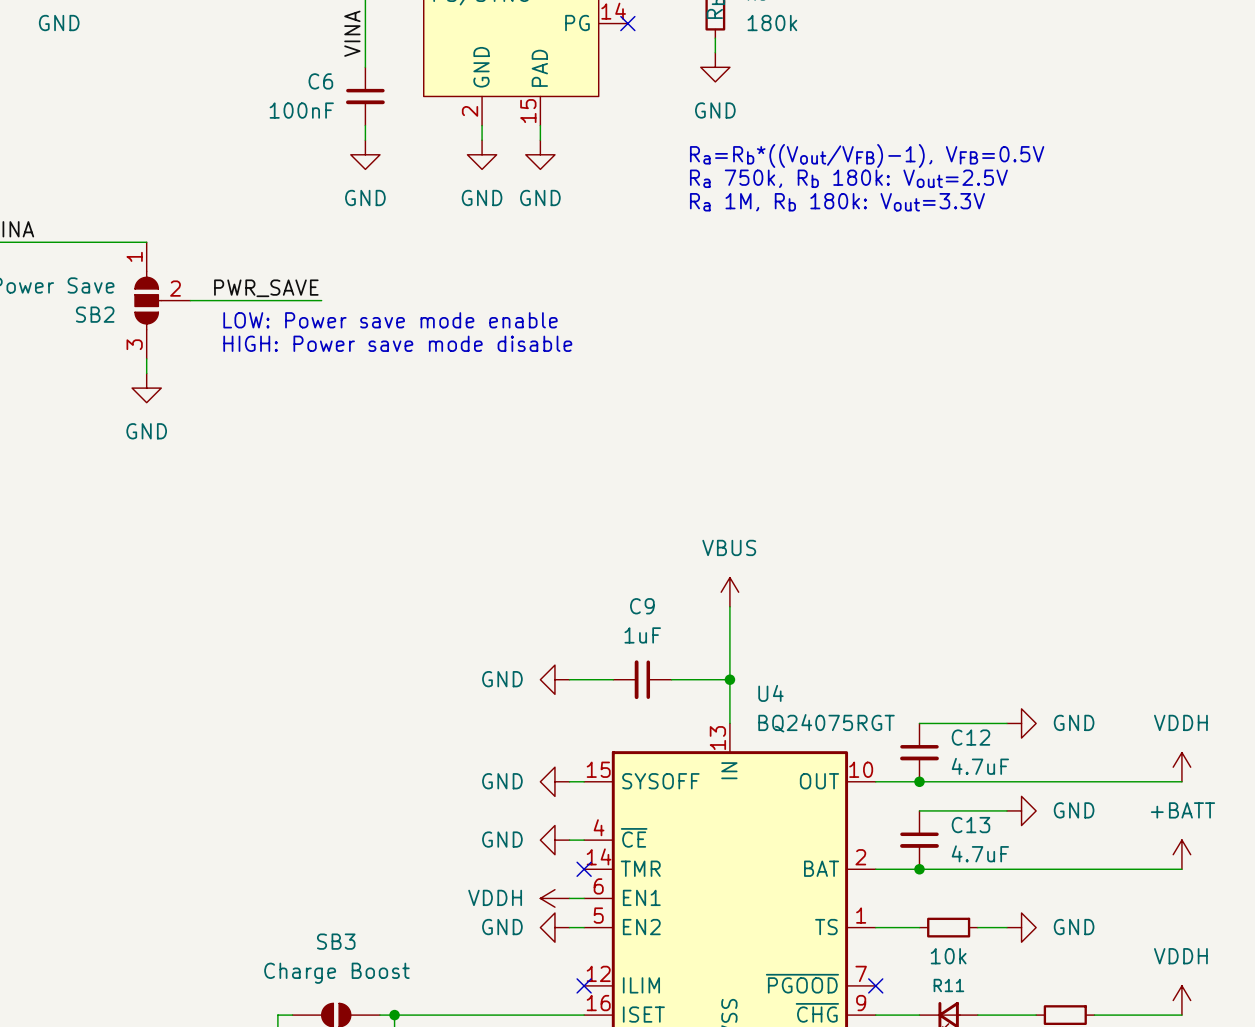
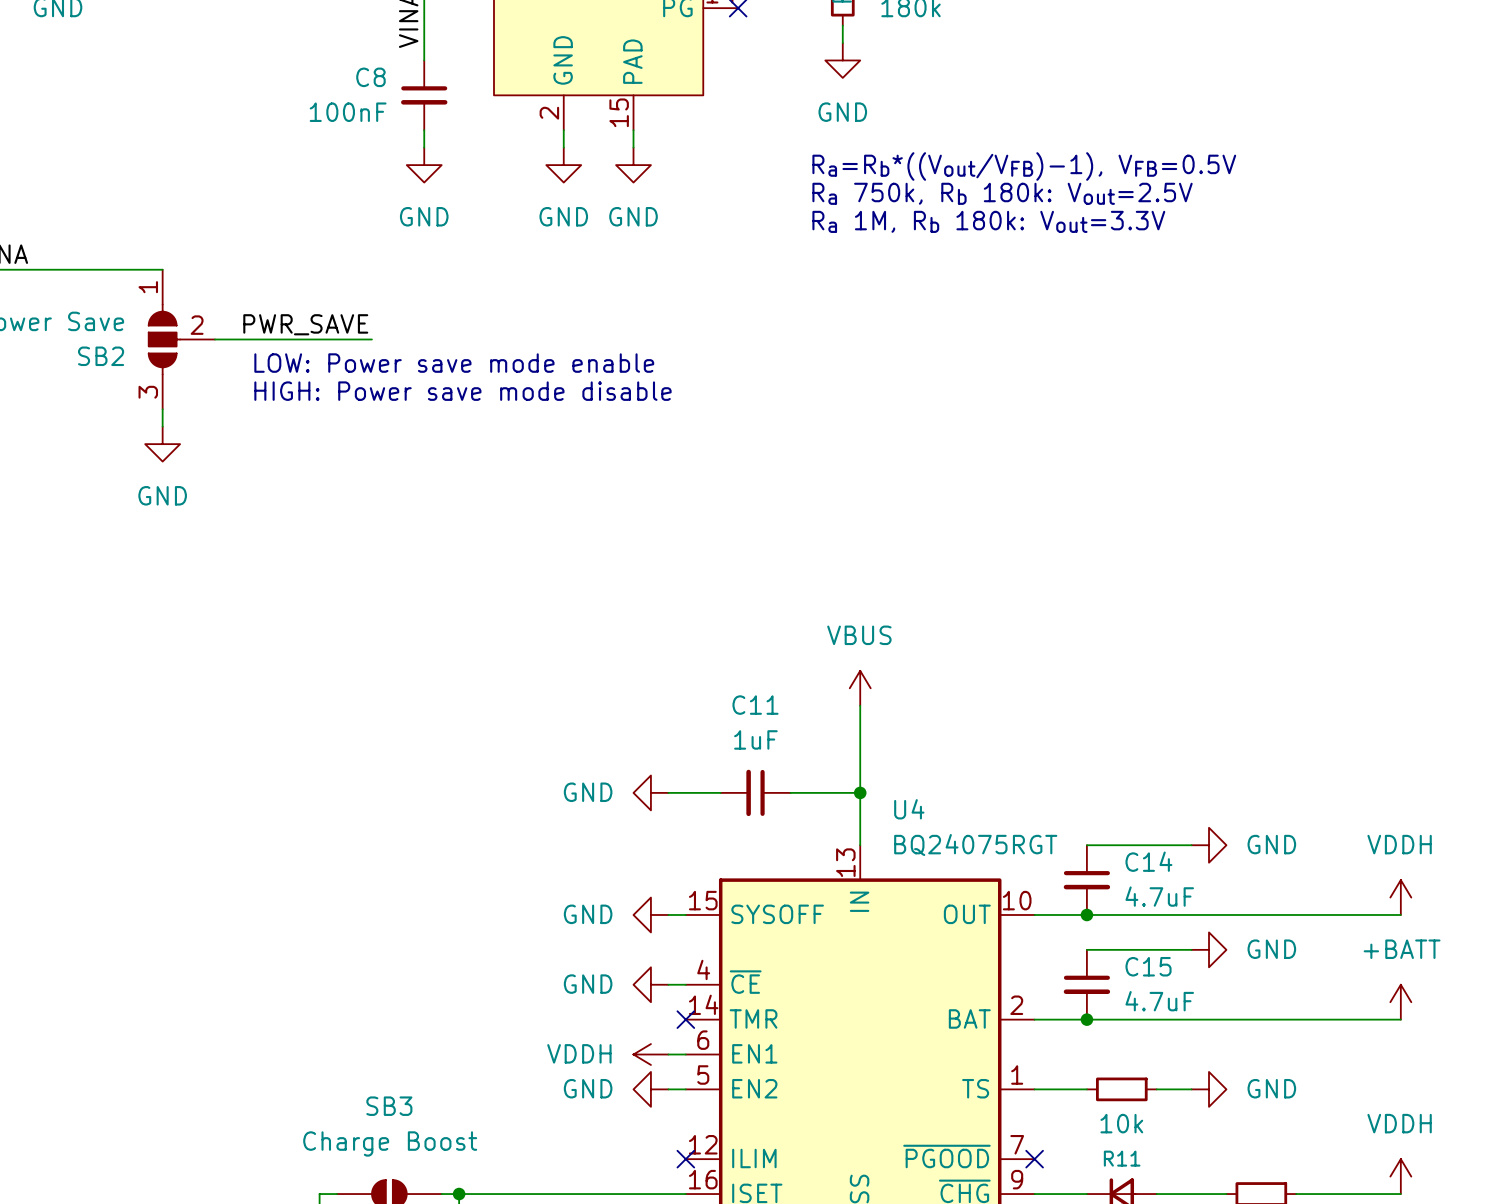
C6 name: C6 (320, 81) -> C8 (370, 77)
C9 name: C9 (642, 606) -> C11 (755, 705)
C12 name: C12 (970, 737) -> C14 (1148, 861)
C13 name: C13 (970, 825) -> C15 (1148, 966)

